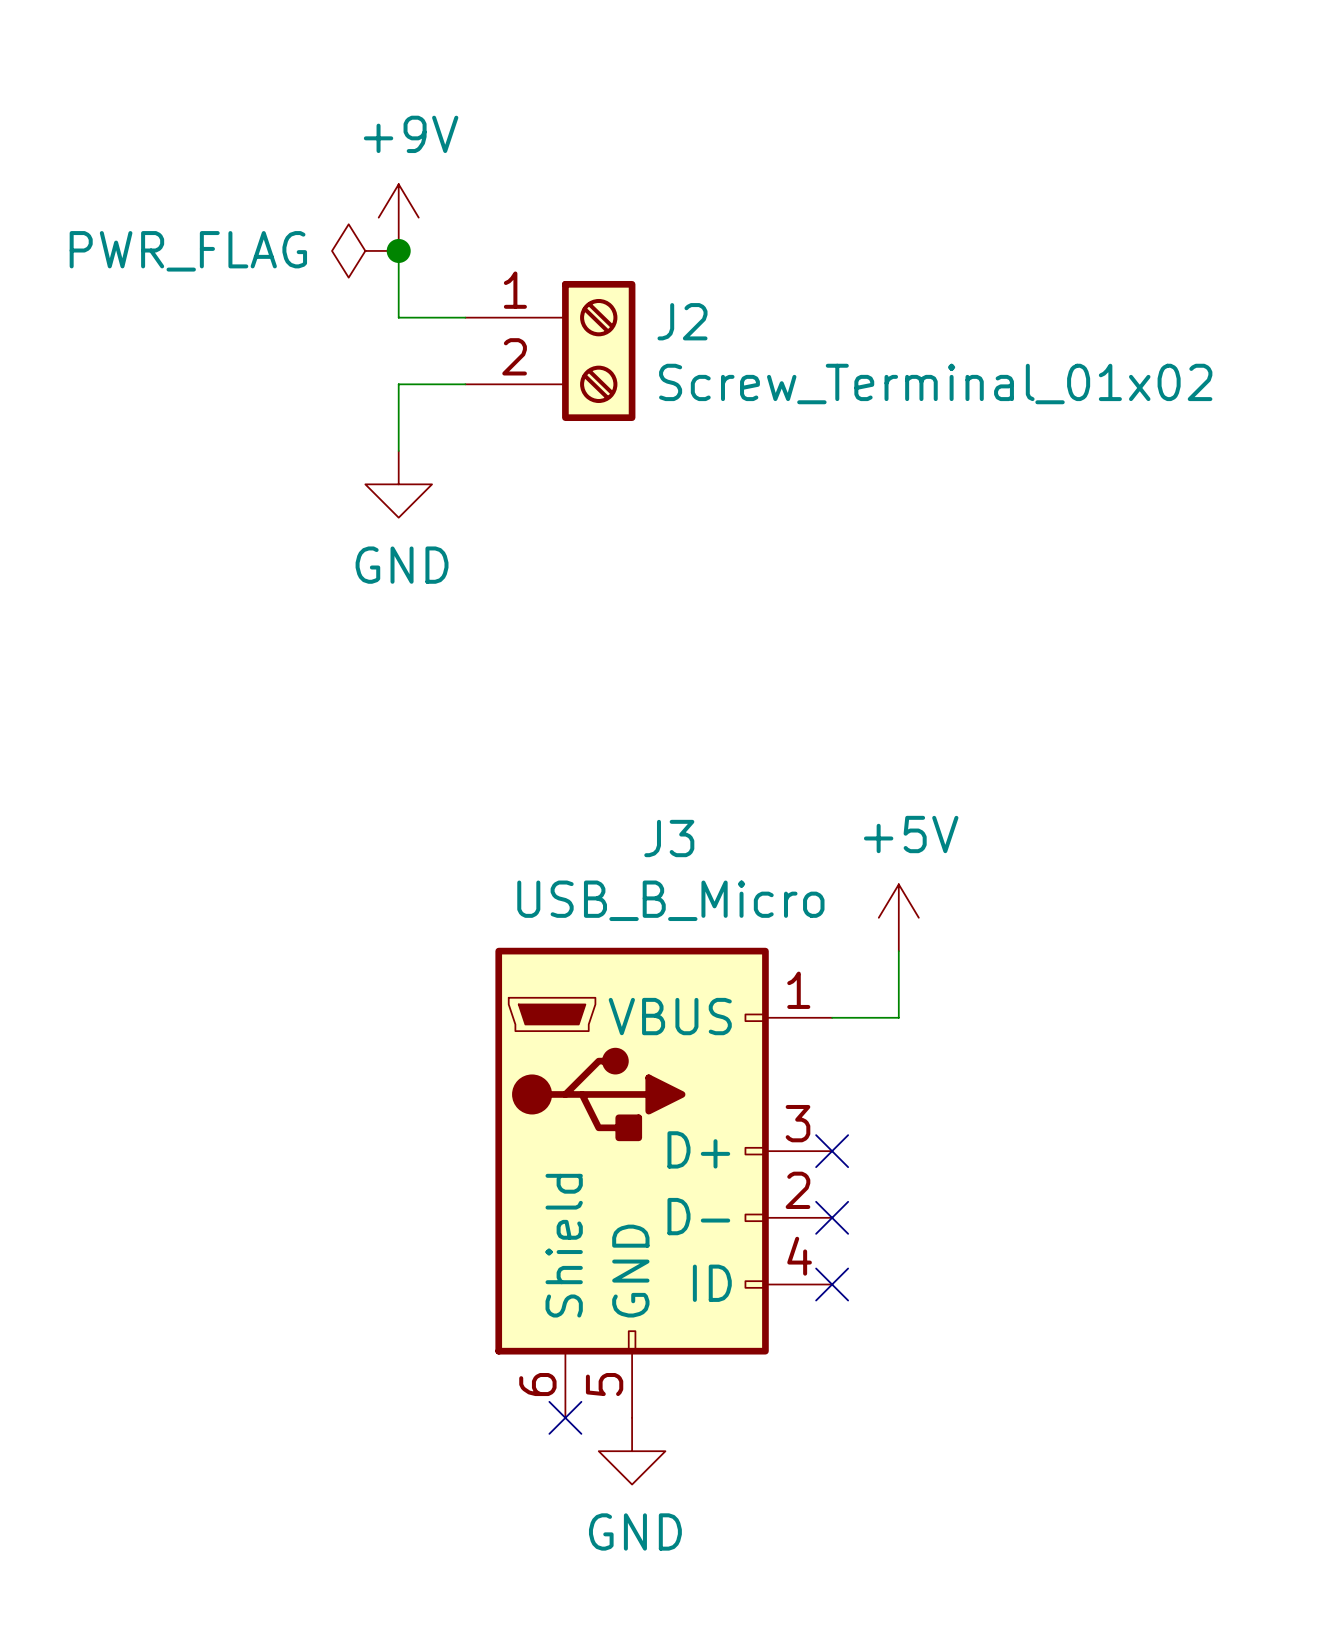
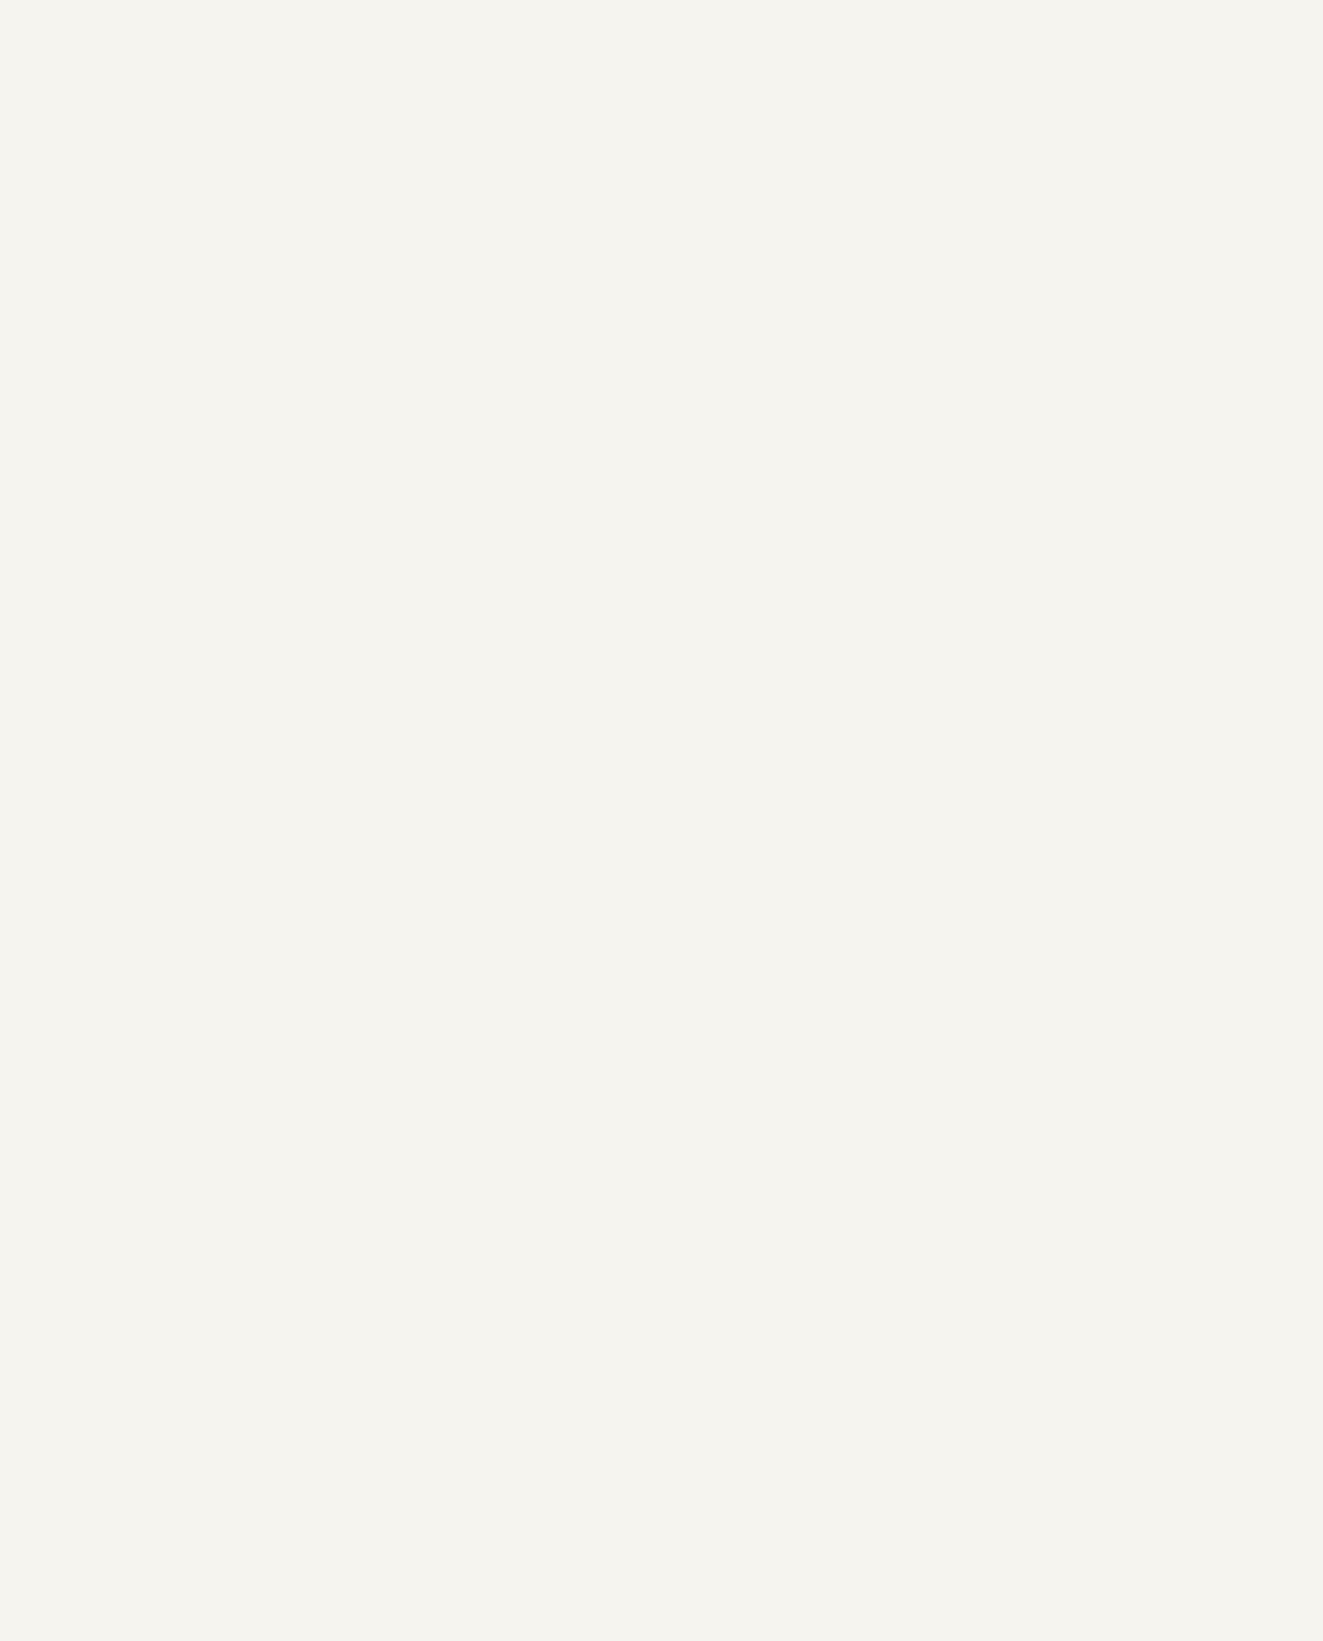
power symbol: +9V (398, 217) -> none
power symbol: PWR_FLAG (365, 250) -> none
wire: (398, 250) (398, 317) (465, 317) -> none
junction: (398, 250) -> none
J2: Screw_Terminal_01x02 (550, 350) -> none
wire: (465, 384) (398, 384) (398, 451) -> none
power symbol: GND (398, 484) -> none
power symbol: +5V (898, 917) -> none
wire: (898, 951) (898, 1017) (832, 1017) -> none
no-connect mark: (832, 1151) -> none
J3: USB_B_Micro (663, 1182) -> none
no-connect mark: (832, 1217) -> none
no-connect mark: (832, 1284) -> none
no-connect mark: (565, 1417) -> none
power symbol: GND (632, 1451) -> none

